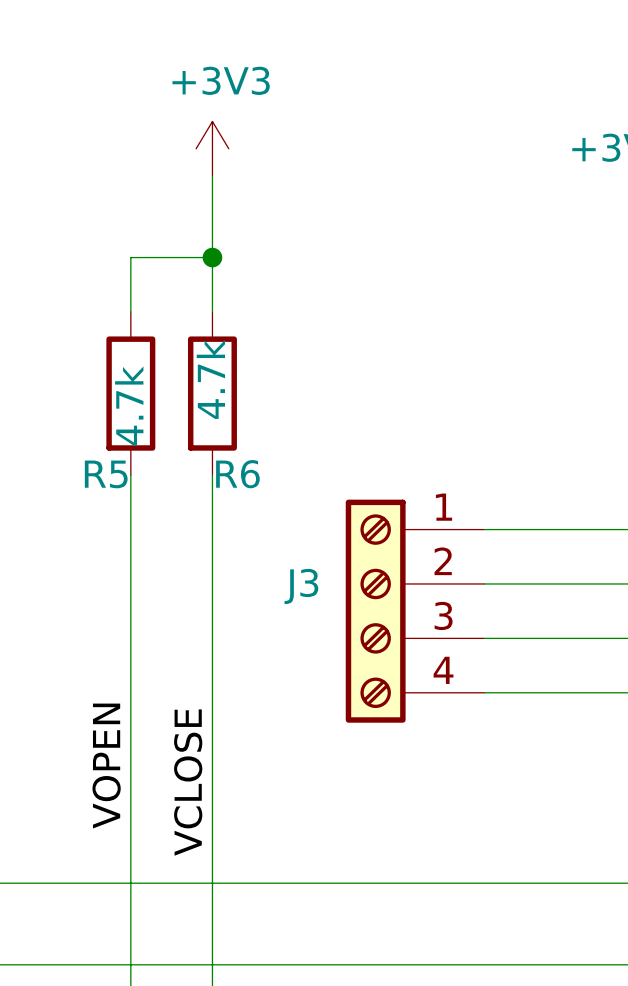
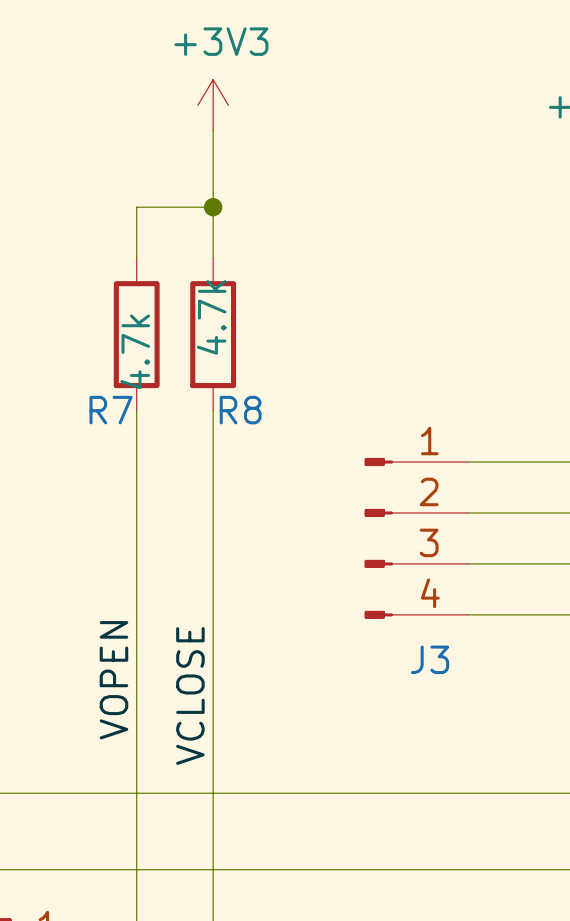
R5 name: R5 (106, 474) -> R7 (111, 410)
R6 name: R6 (237, 474) -> R8 (240, 410)
J3 symbol: [345, 499, 485, 723] -> [364, 457, 468, 619]
J3 name position: J3 (301, 586) -> J3 (430, 659)

